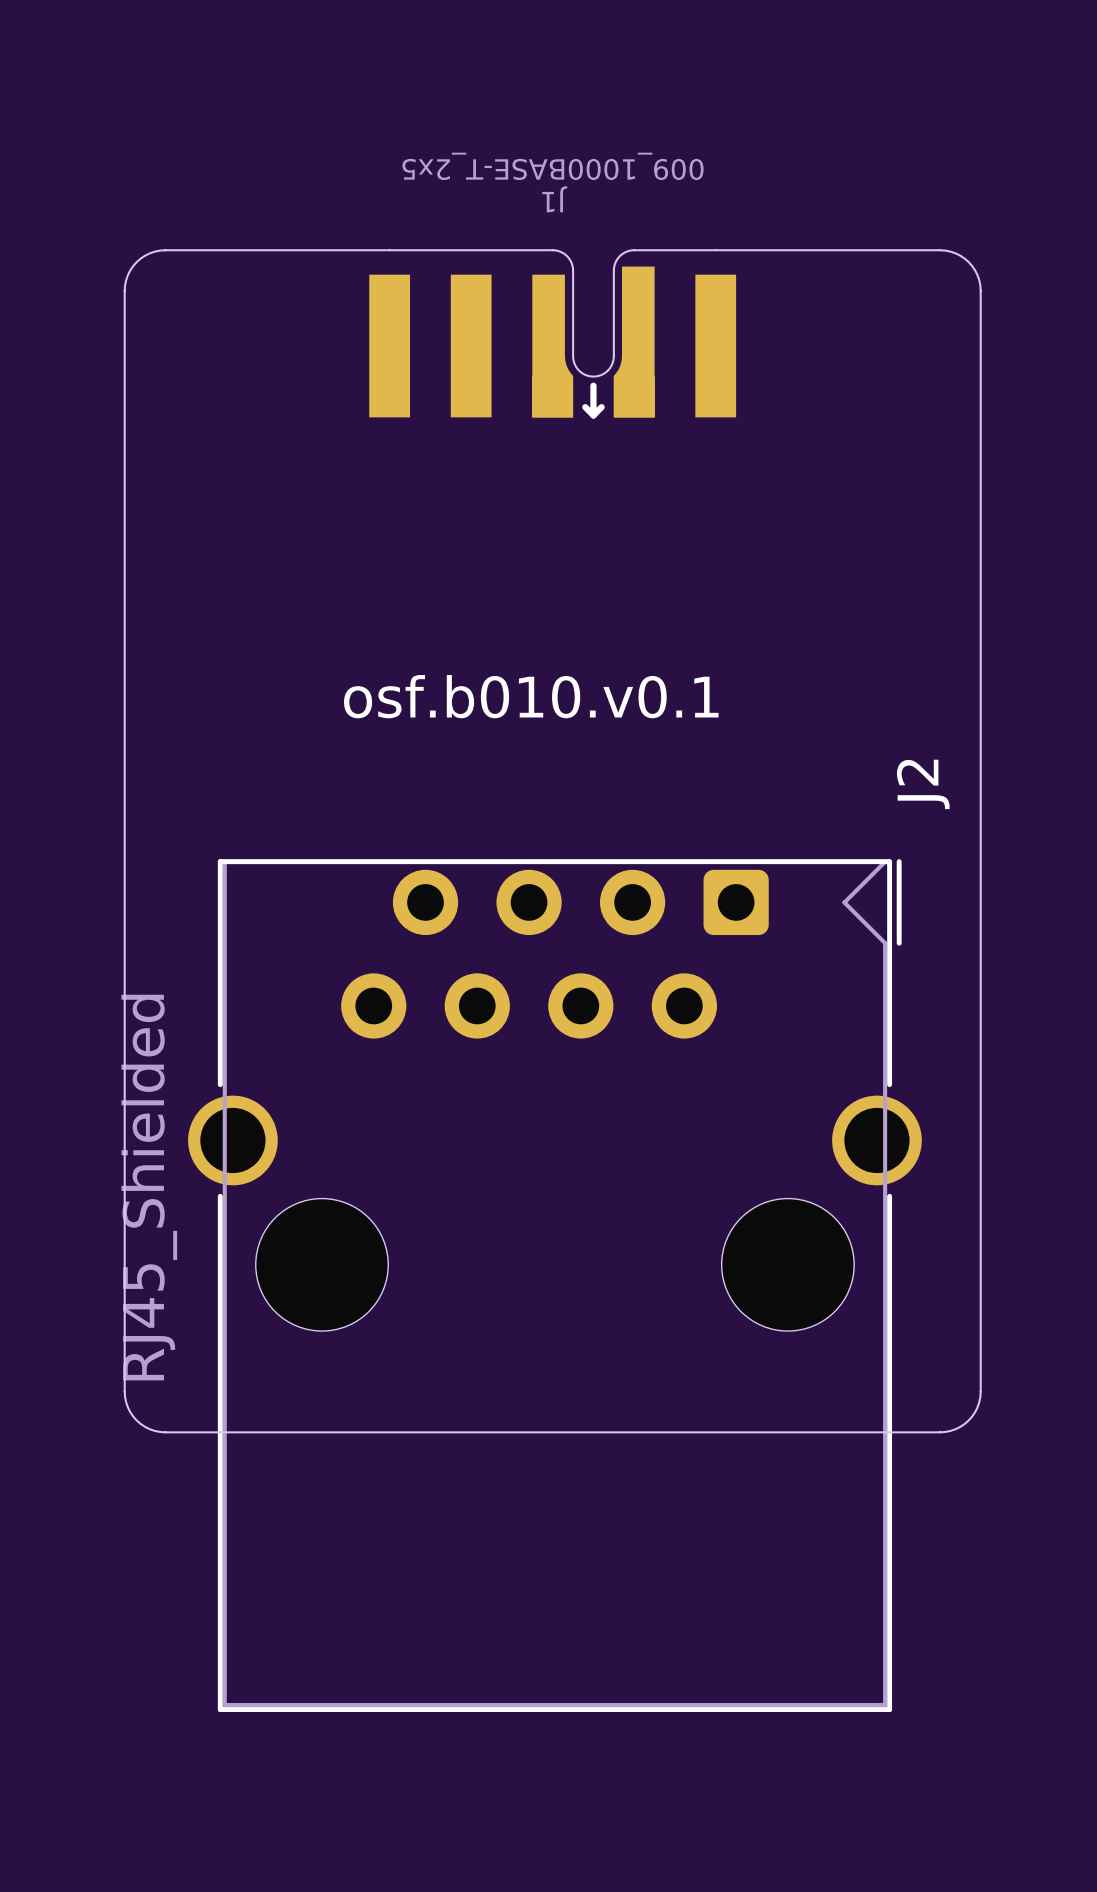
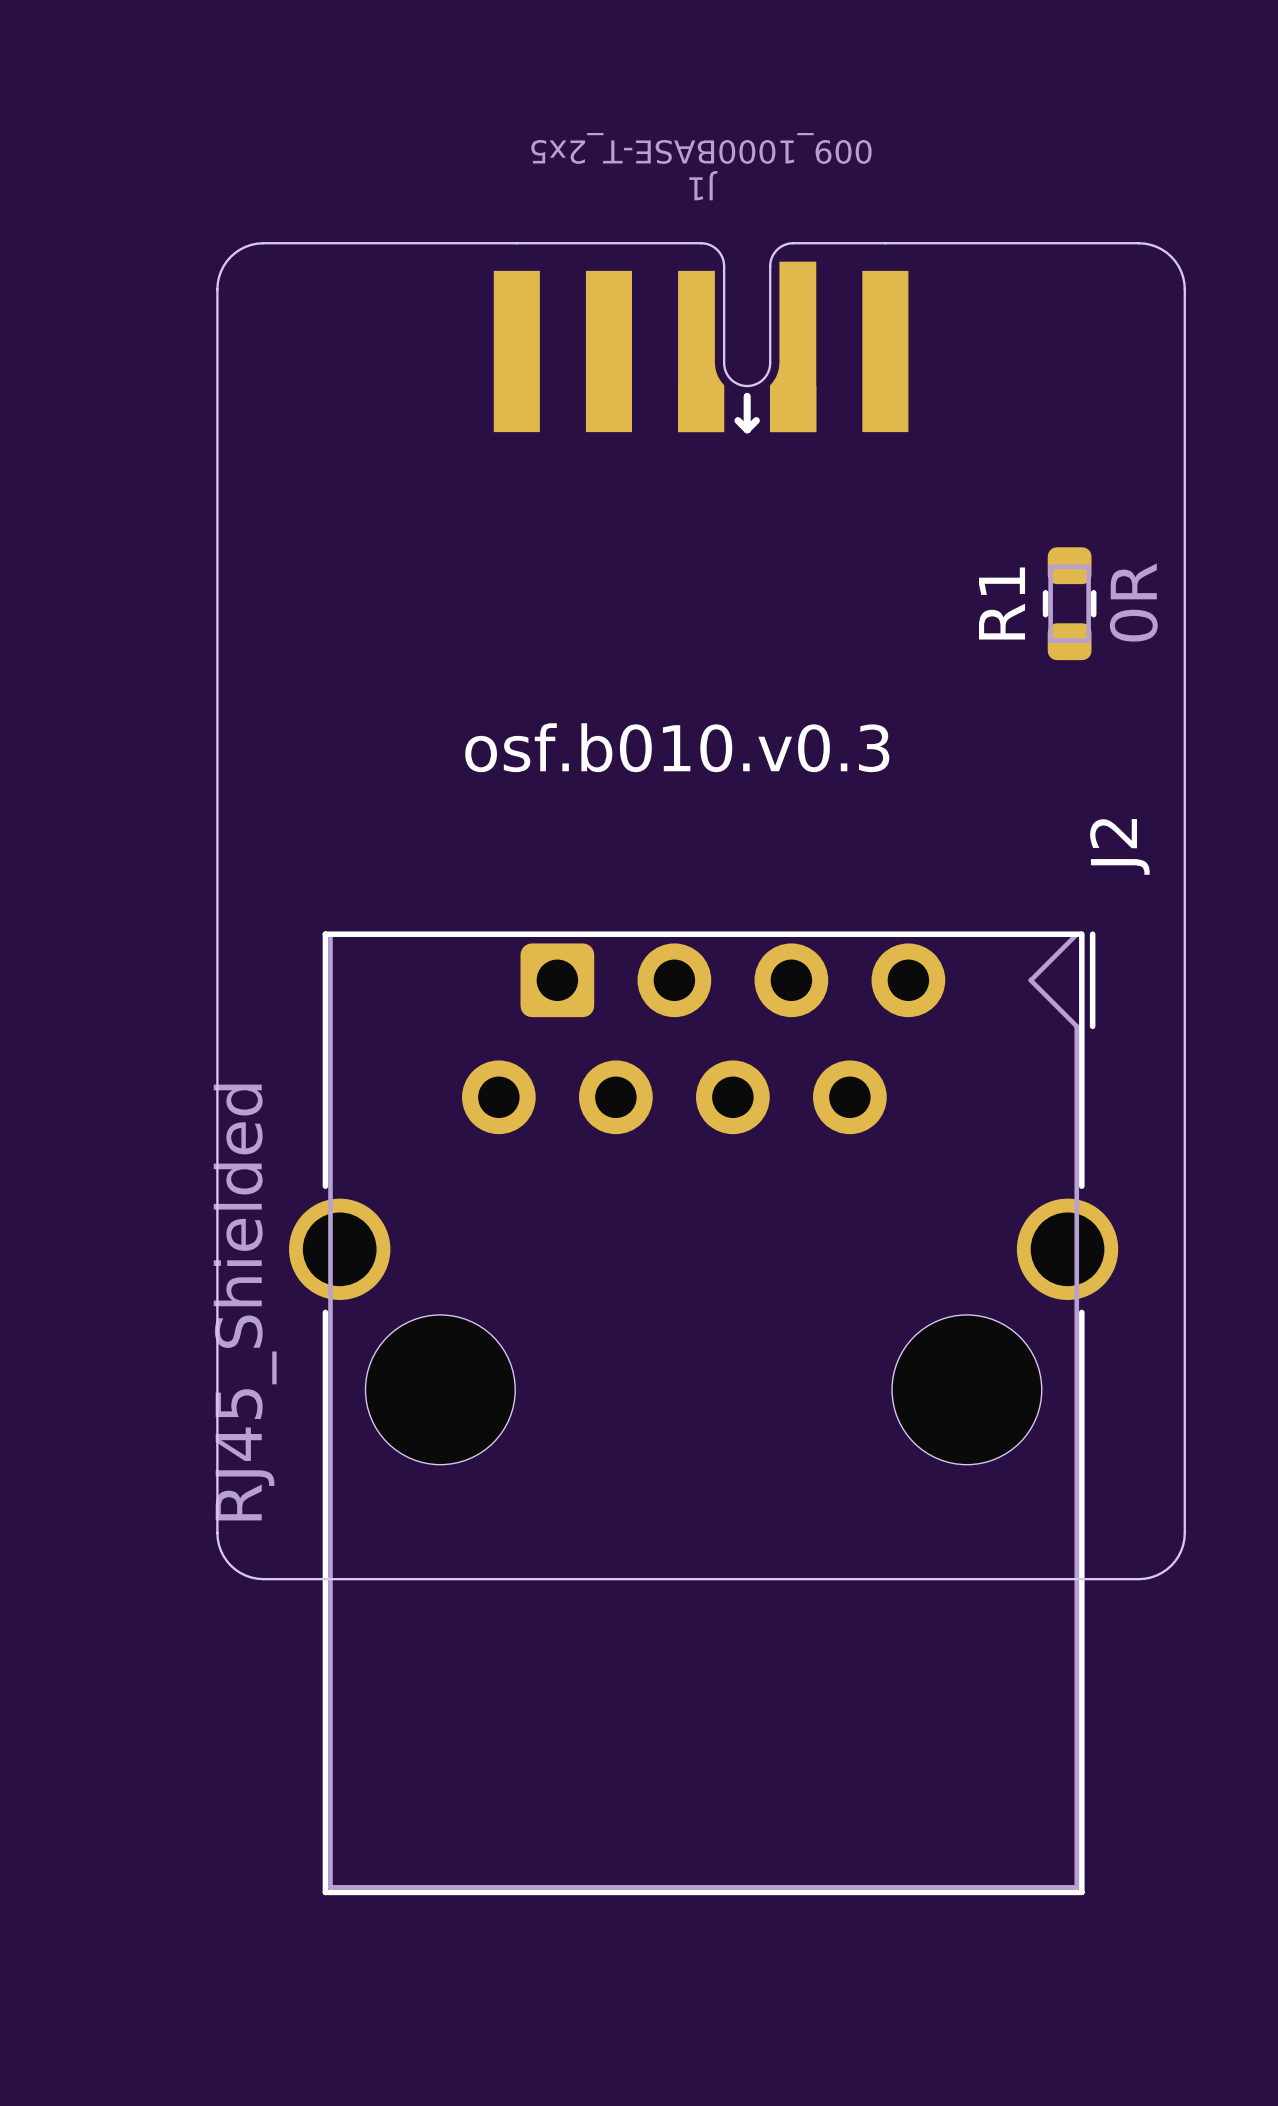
R1: none -> 0R (1069, 603)
text: osf.b010.v0.1 (531, 696) -> osf.b010.v0.3 (677, 747)
J2 footprint: [188, 859, 922, 1712] -> [289, 931, 1119, 1896]

